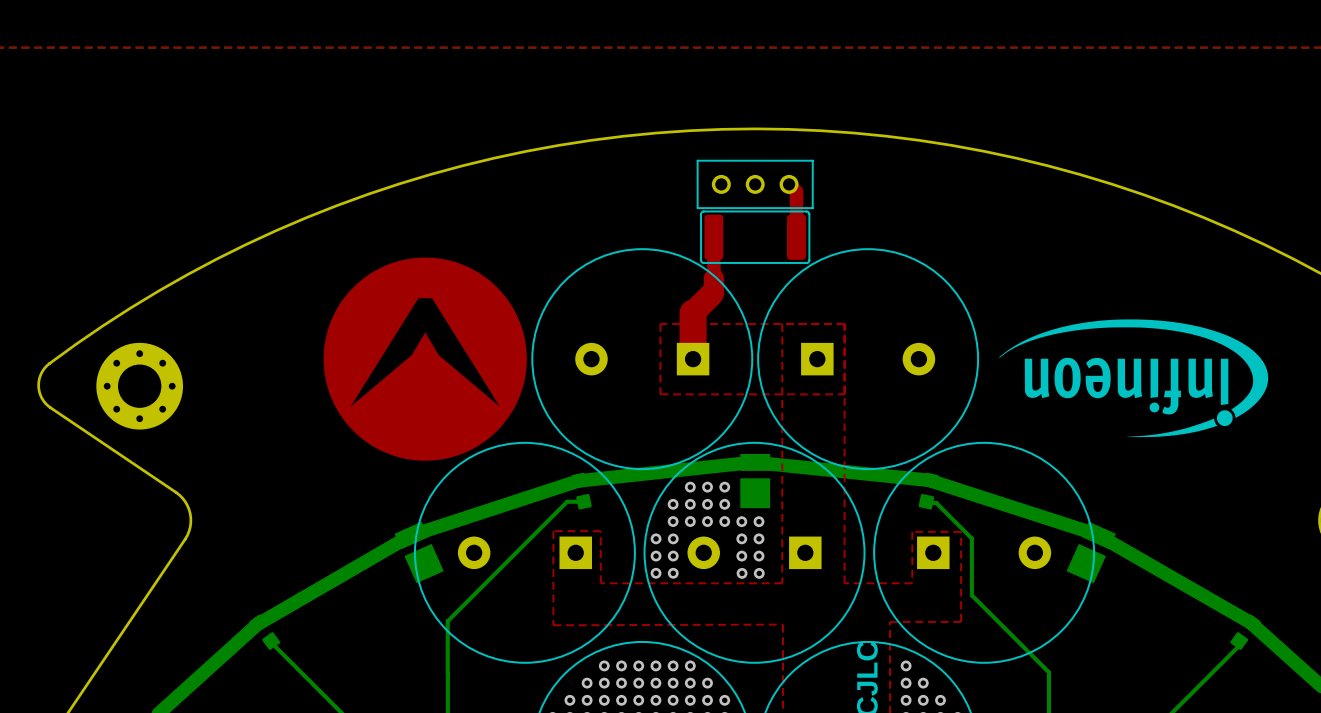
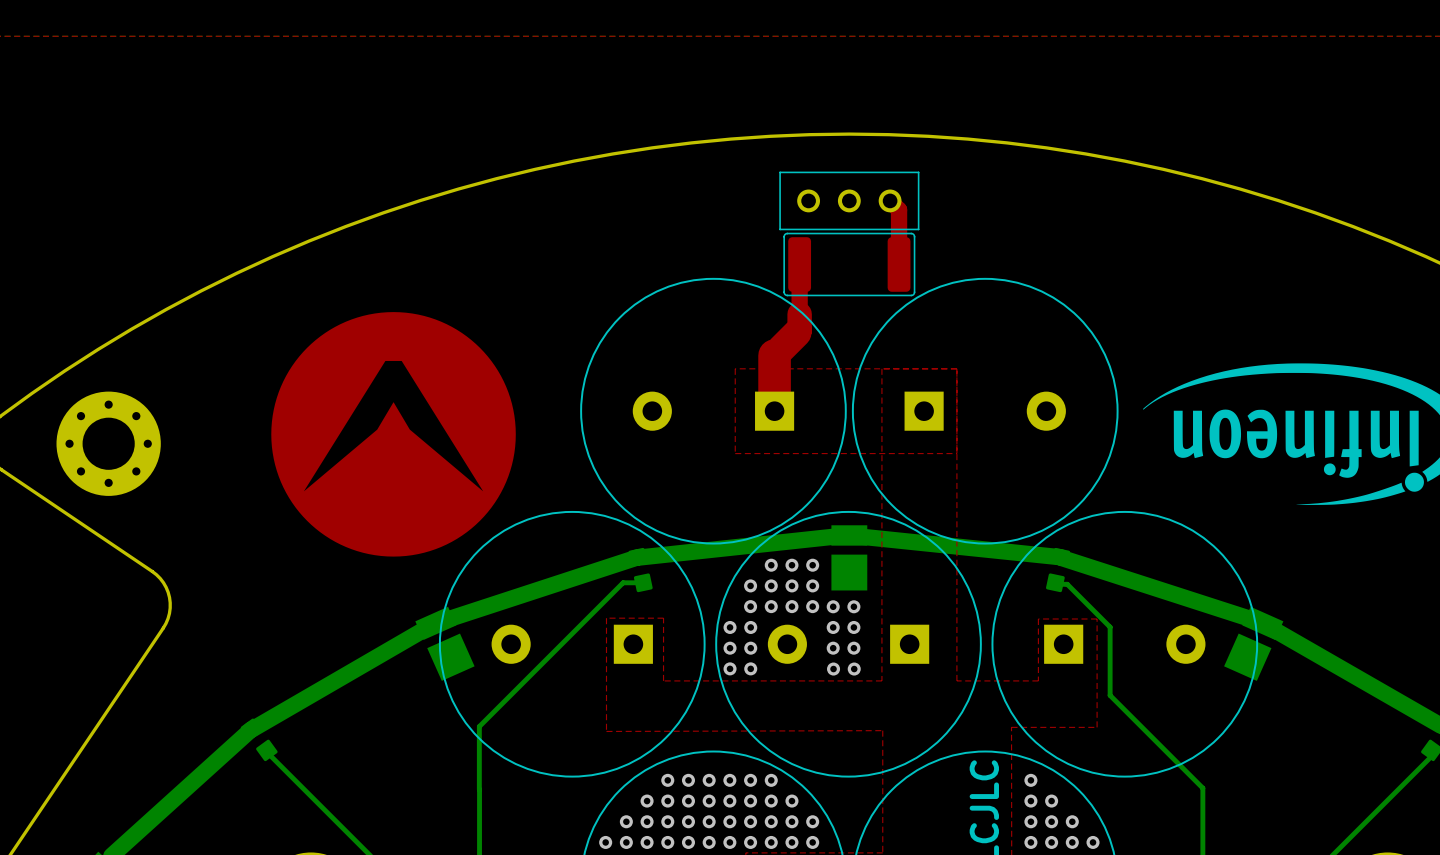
part position: (425, 359) -> (393, 434)

